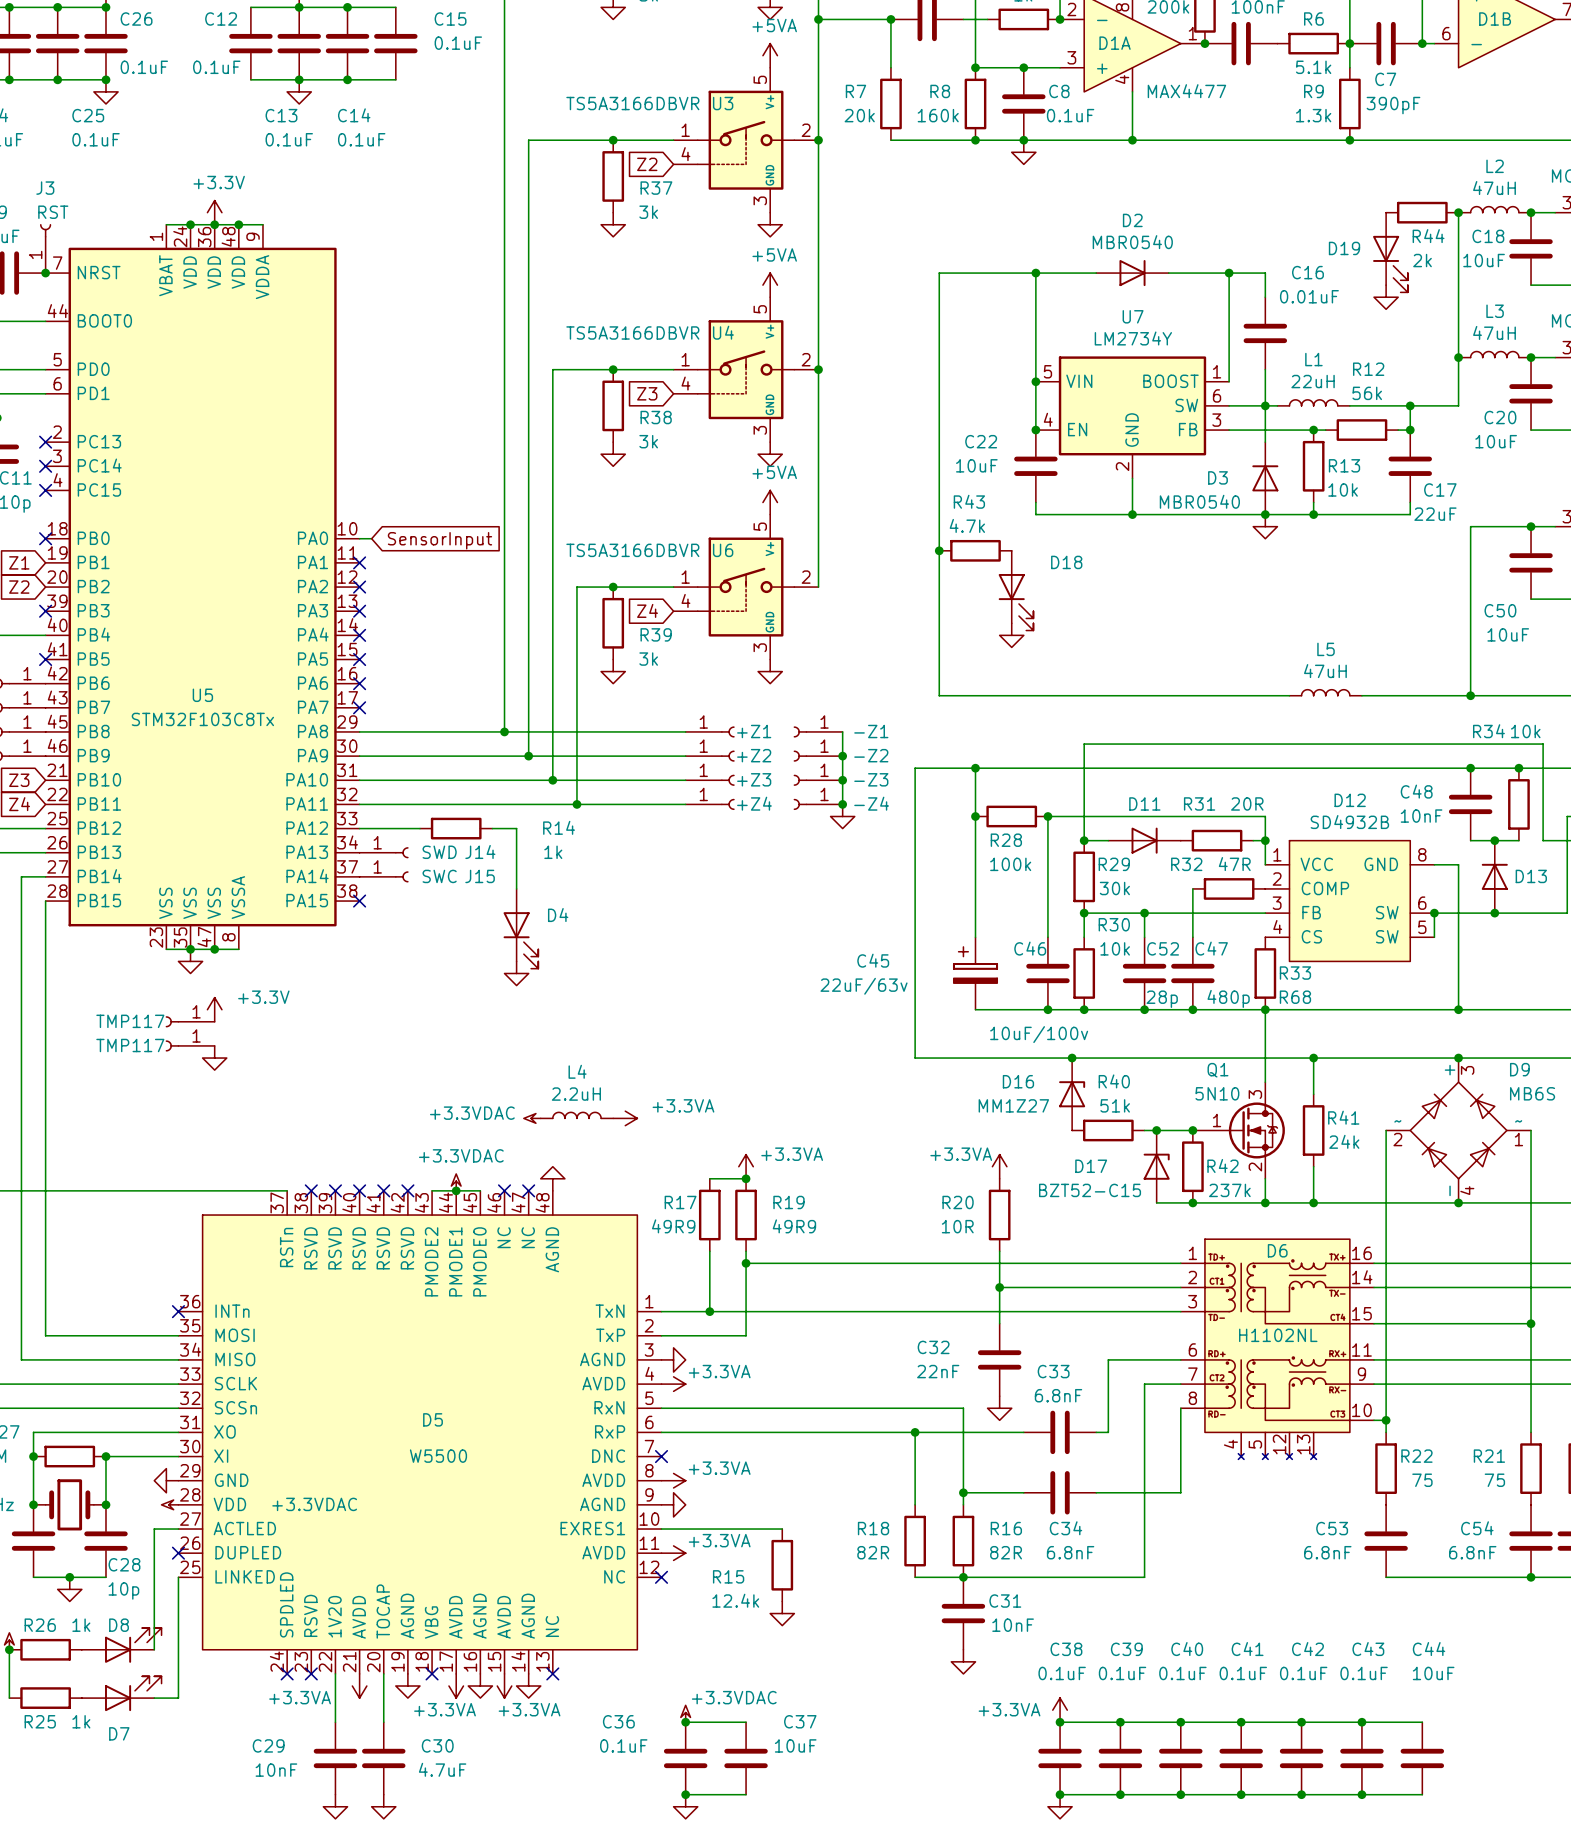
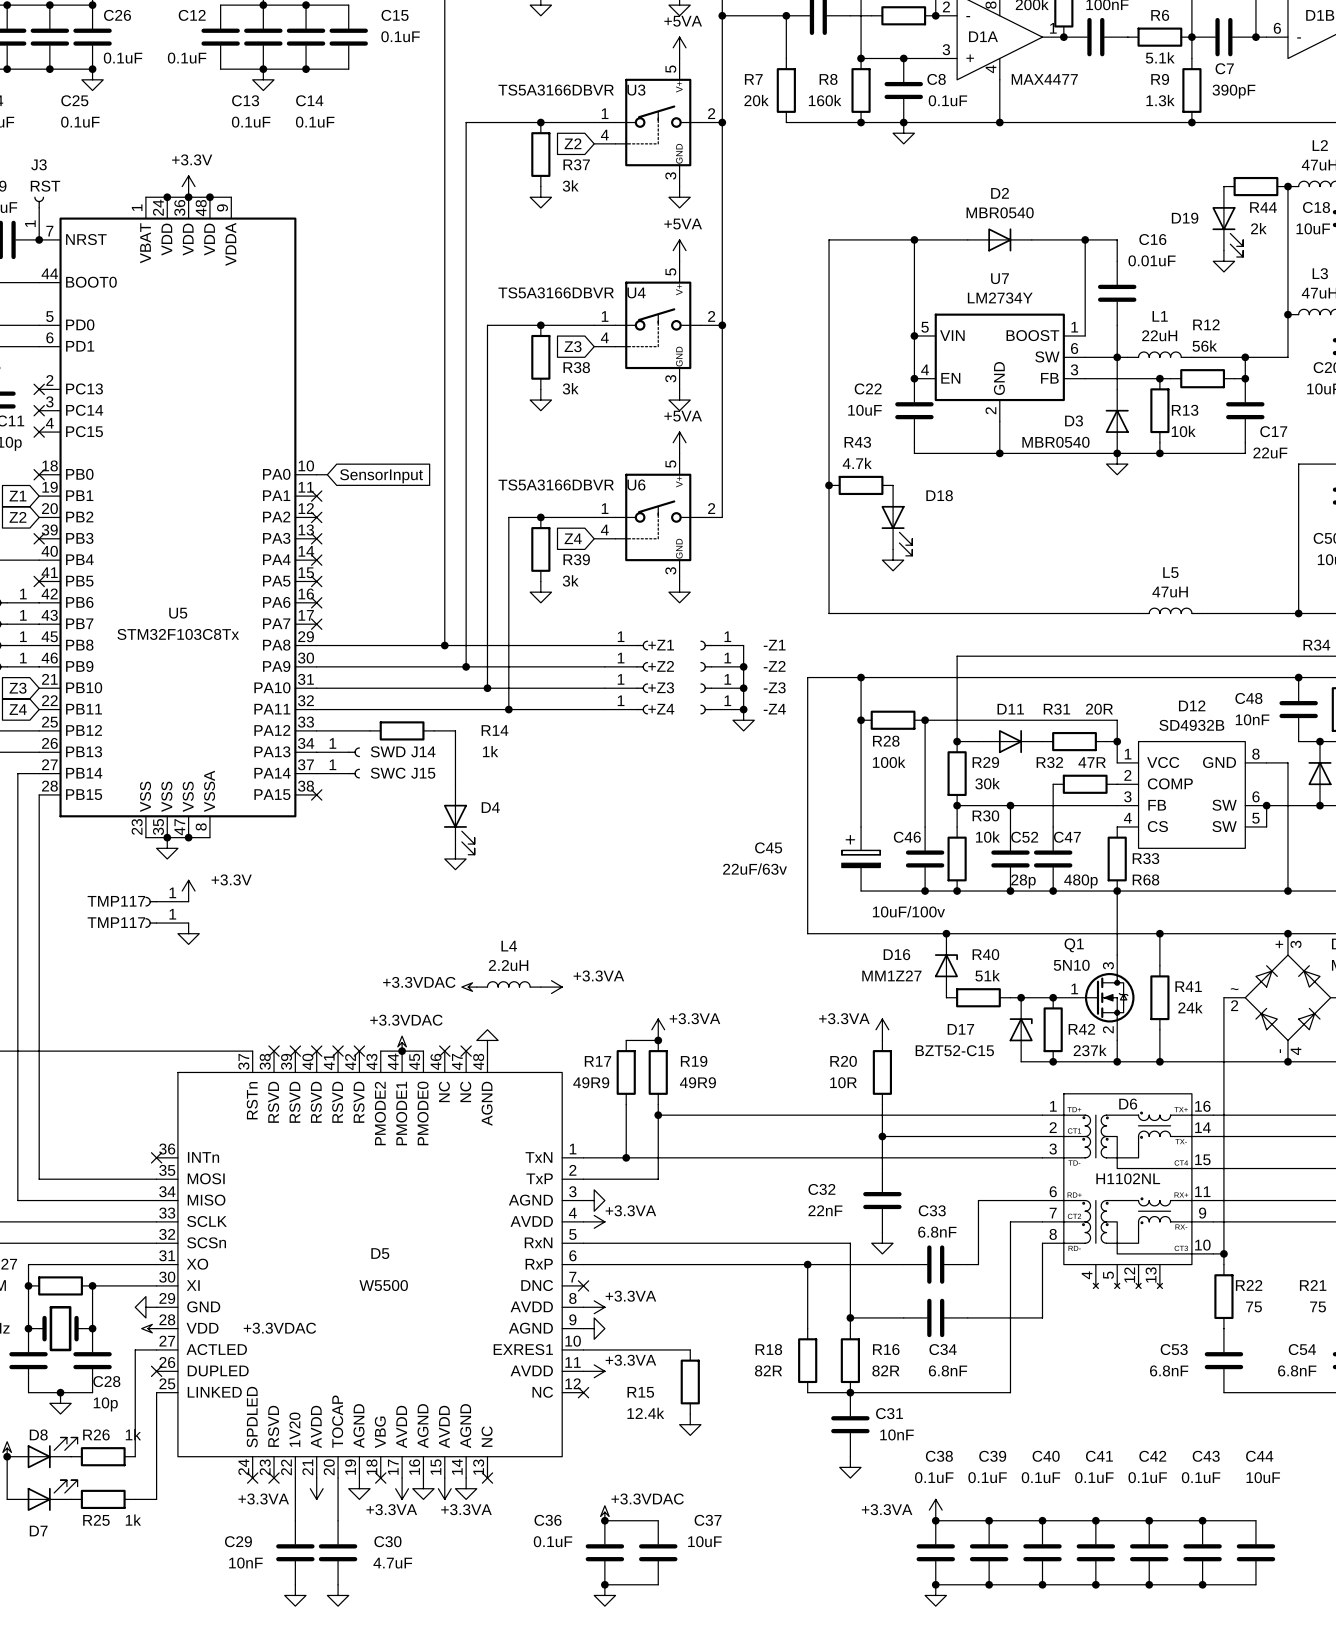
D8 position: (121, 1645) -> (42, 1452)
R26 position: (45, 1649) -> (103, 1456)
D7 position: (121, 1693) -> (42, 1495)
R25 position: (45, 1698) -> (103, 1499)

